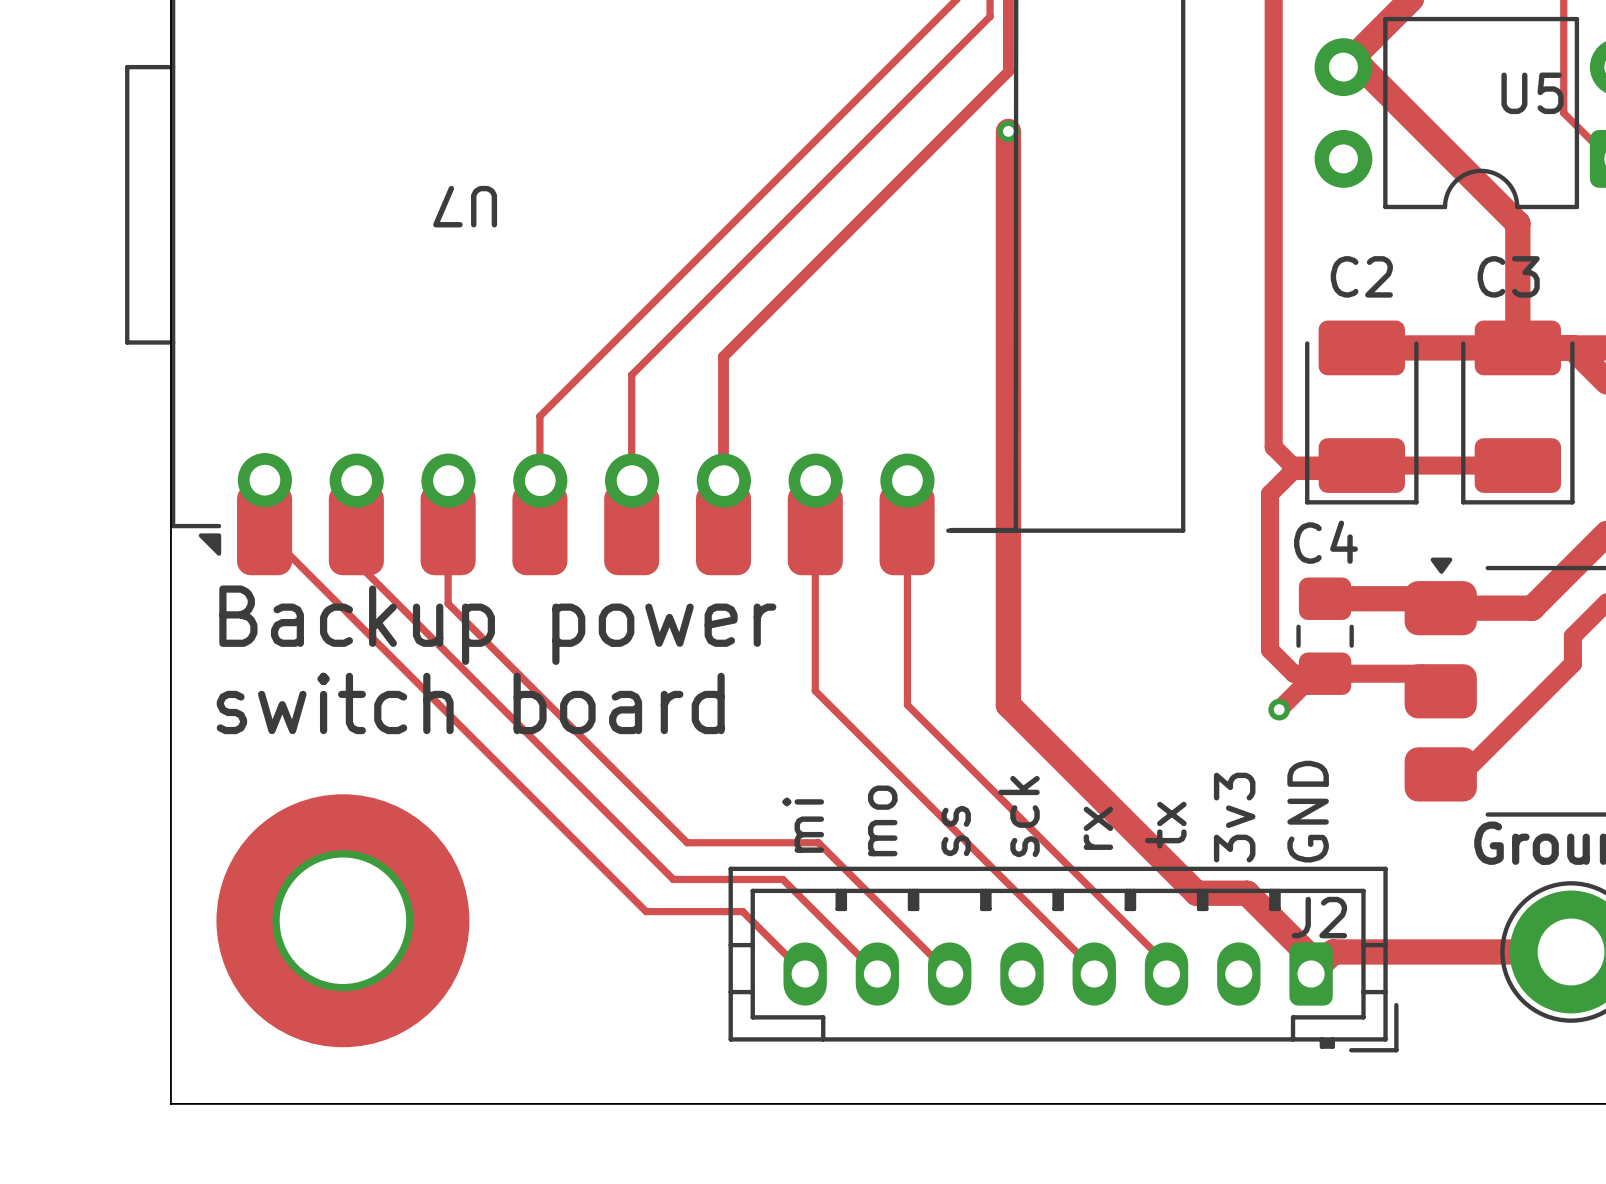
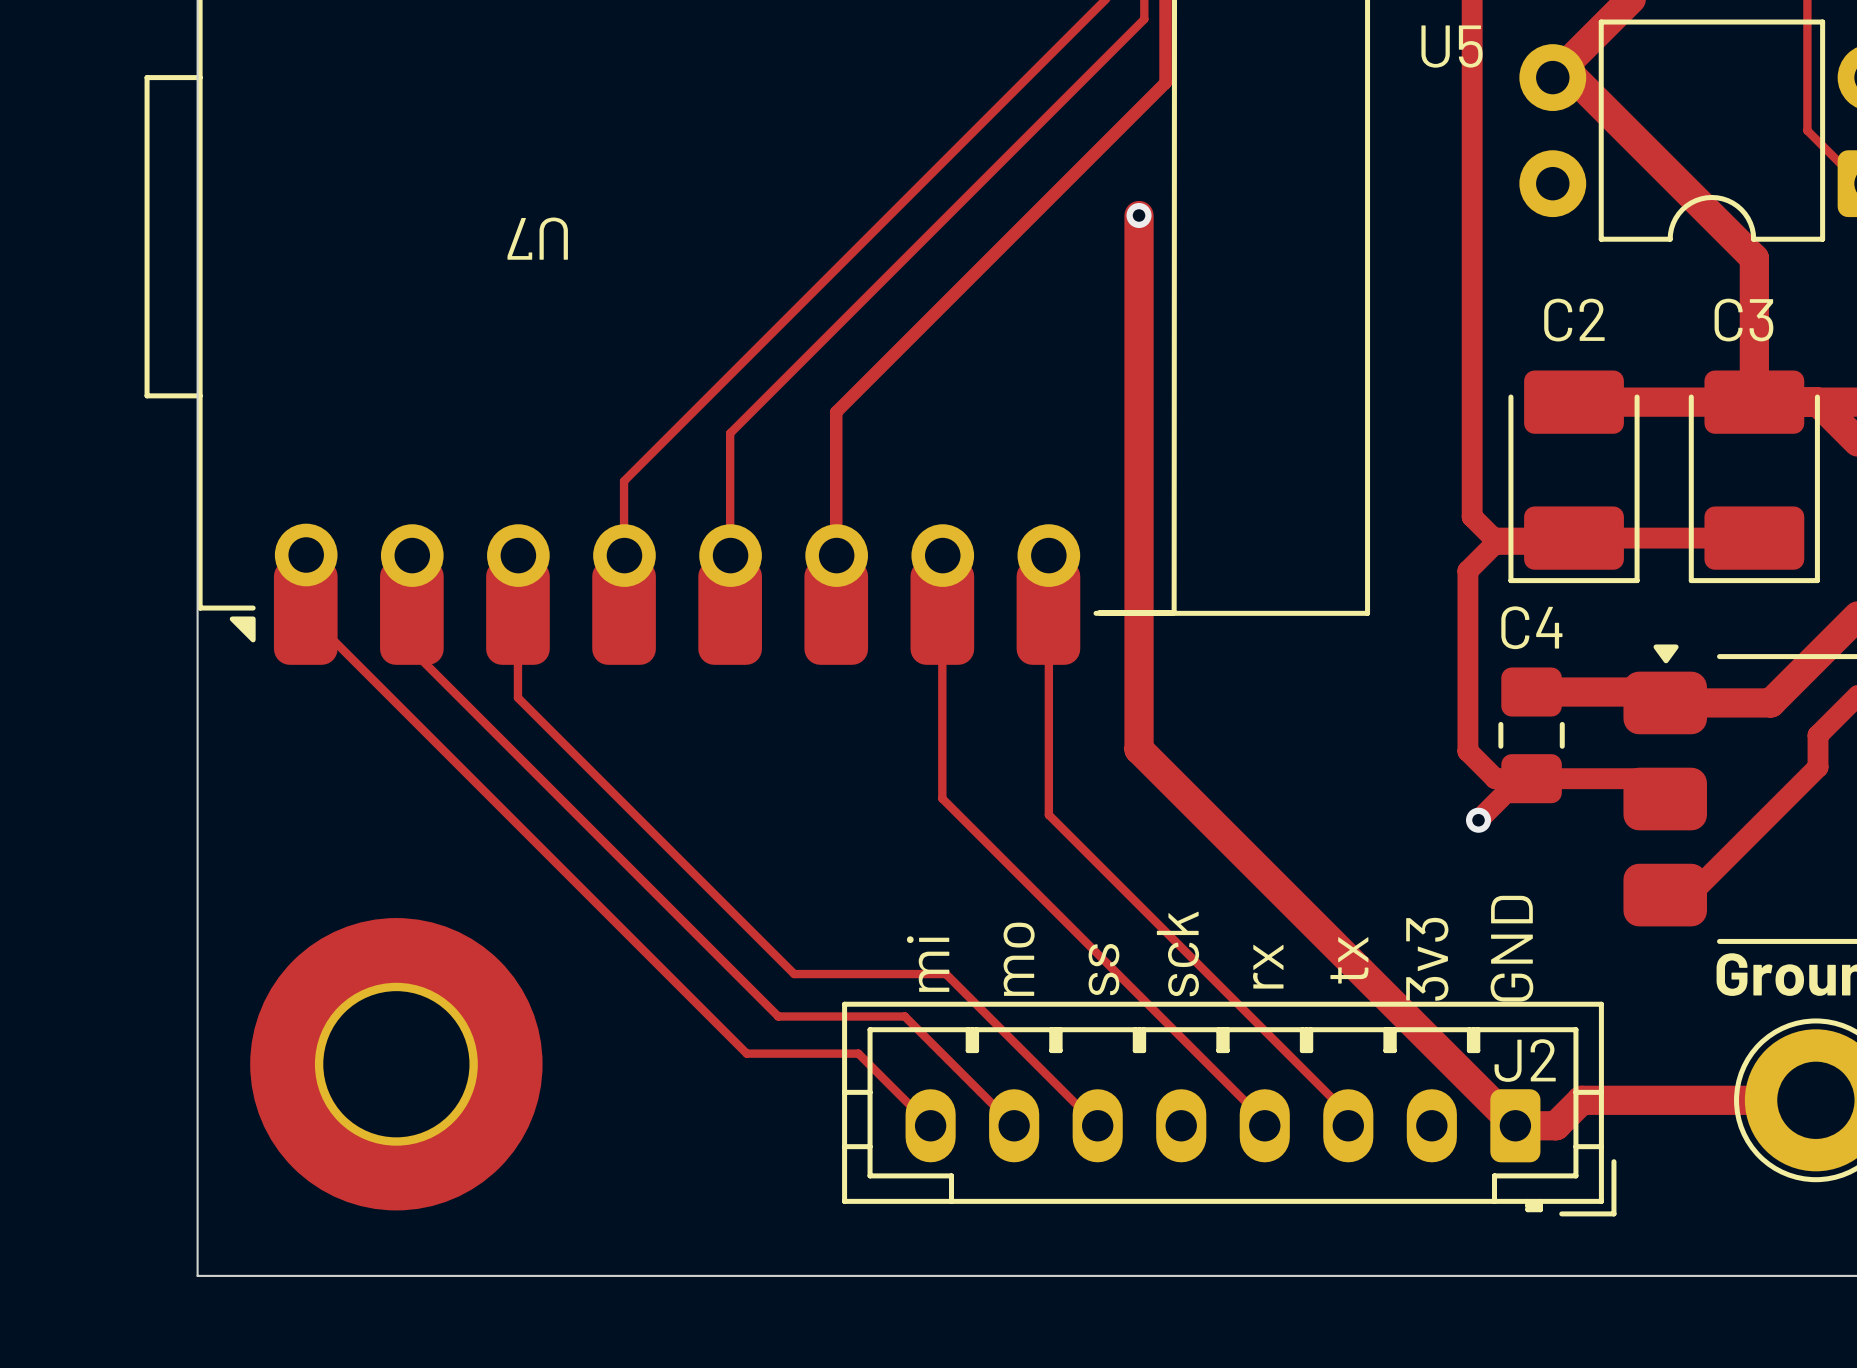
U5 name position: U5 (1532, 93) -> U5 (1452, 46)
track: (1008, 131) (1008, 705) (1196, 893) (1247, 893) (1311, 957) (1311, 974) (1333, 951) (1368, 951) -> (1139, 215) (1139, 749) (1515, 1125) (1555, 1125) (1581, 1100)
via position: (1008, 131) -> (1139, 215)
text: Backup power (497, 625) -> none
text: switch board (470, 703) -> none

